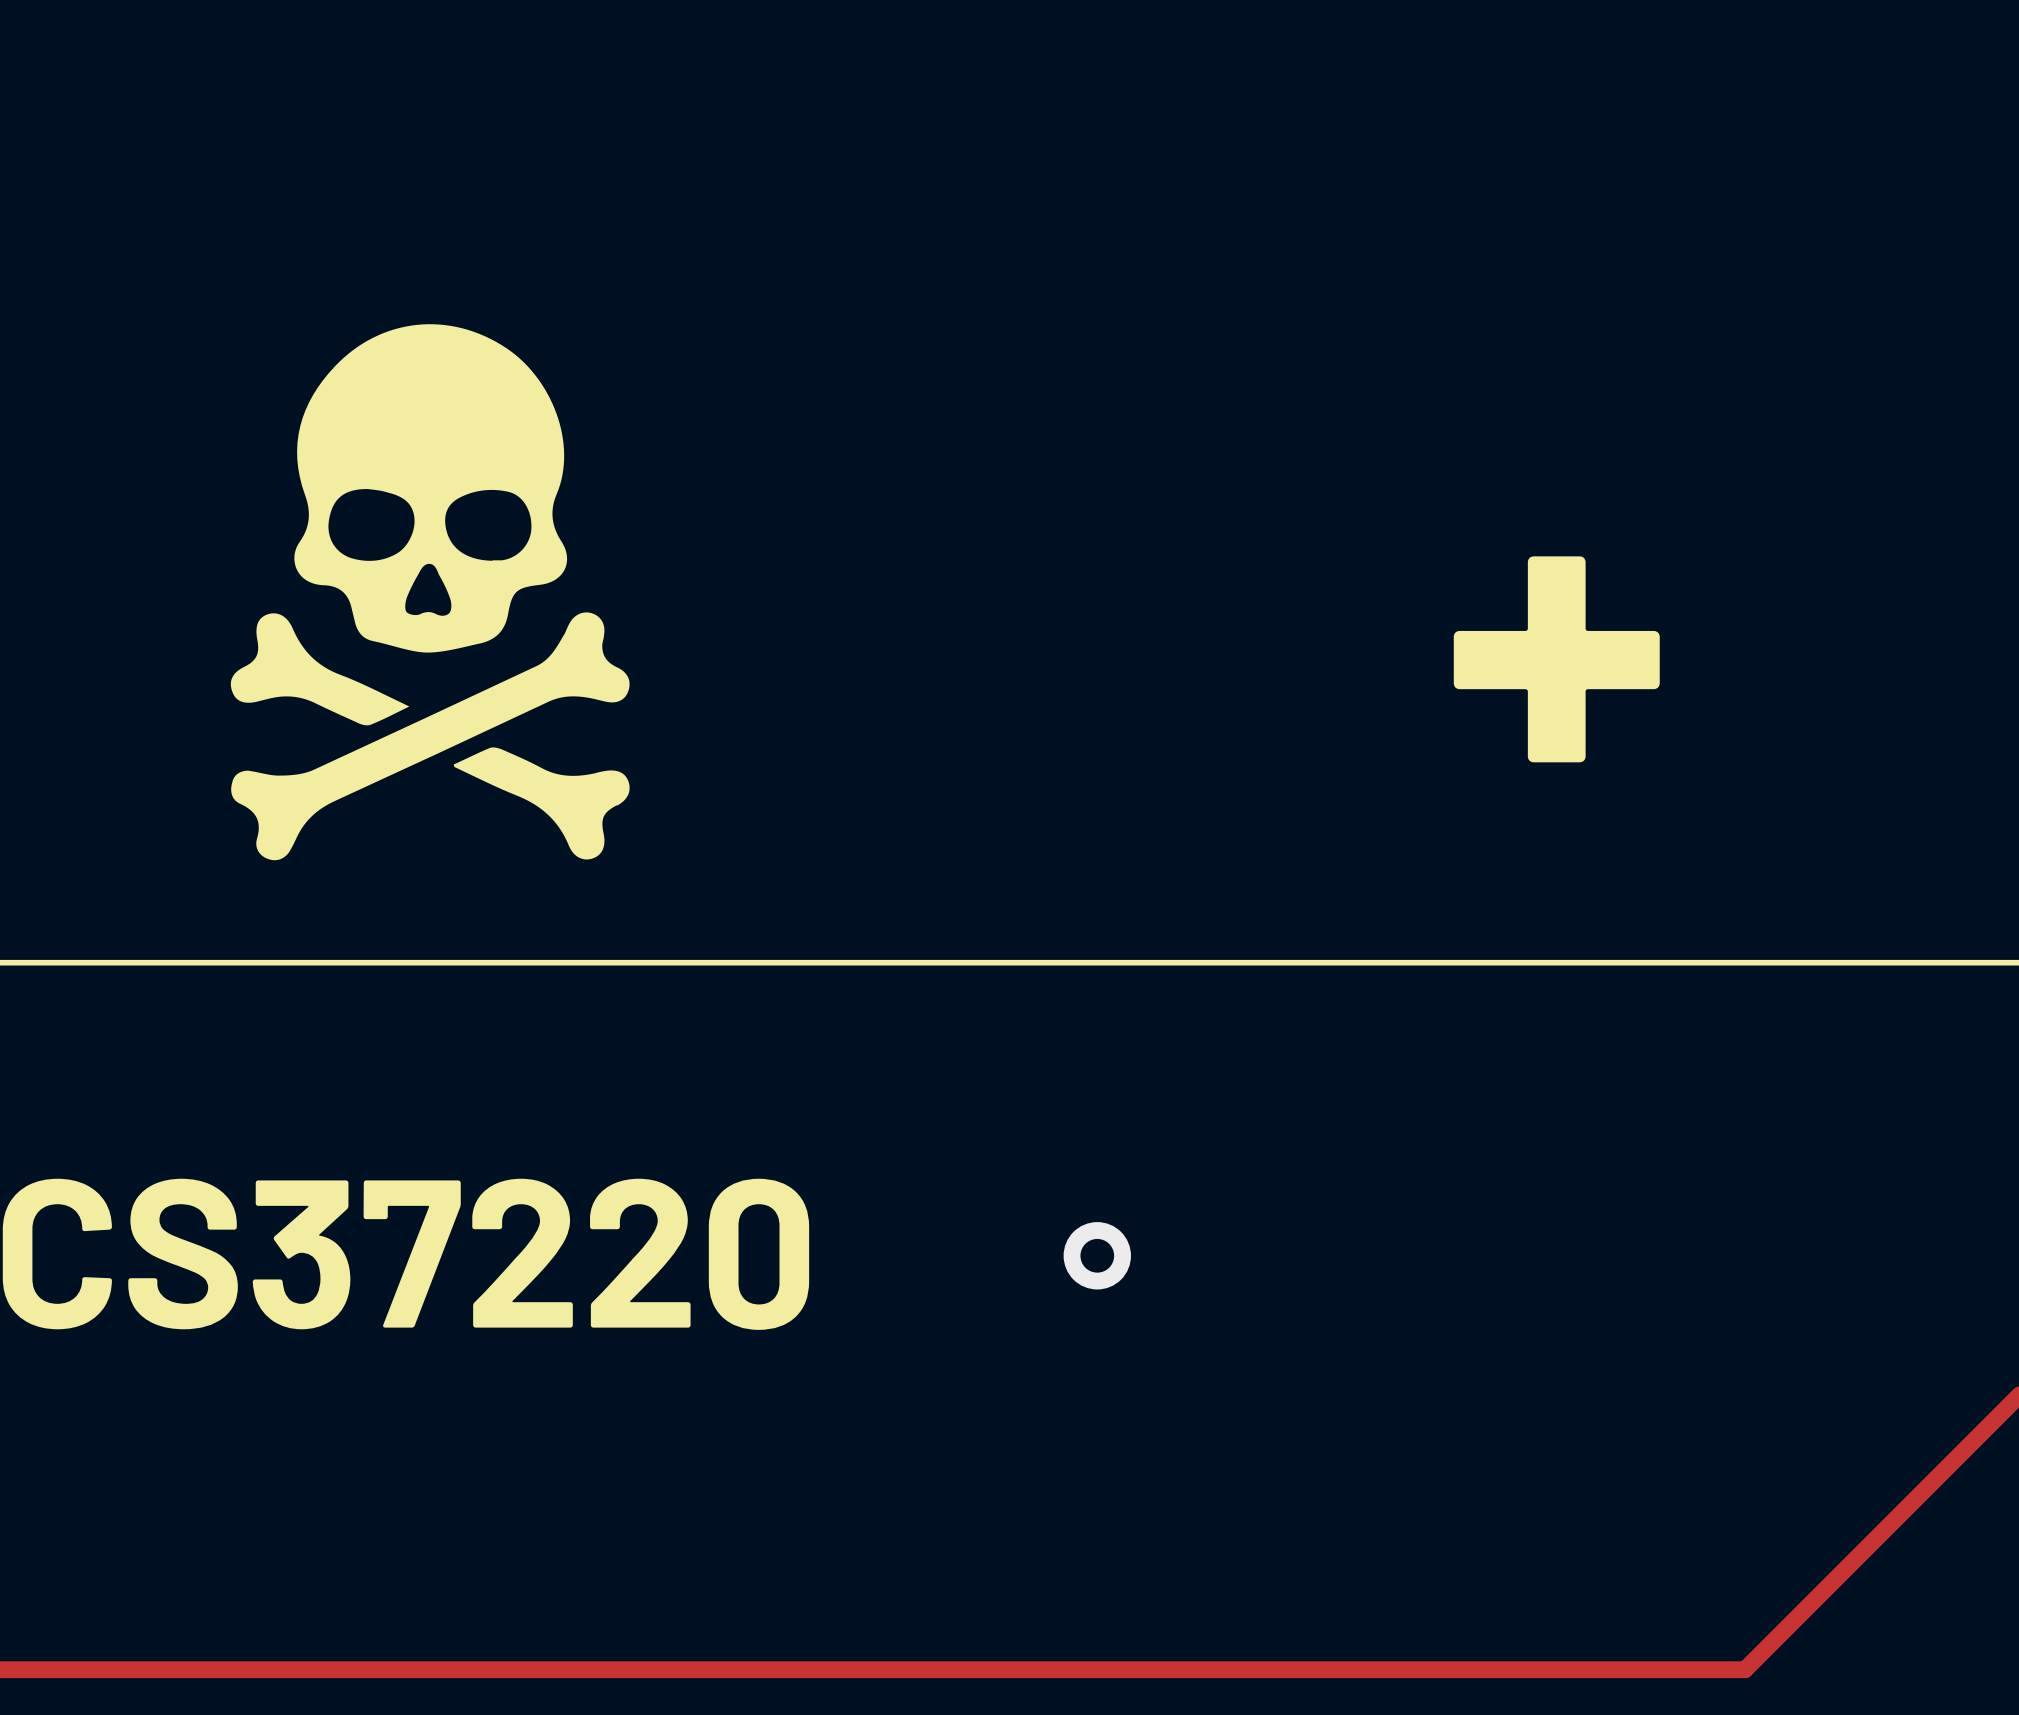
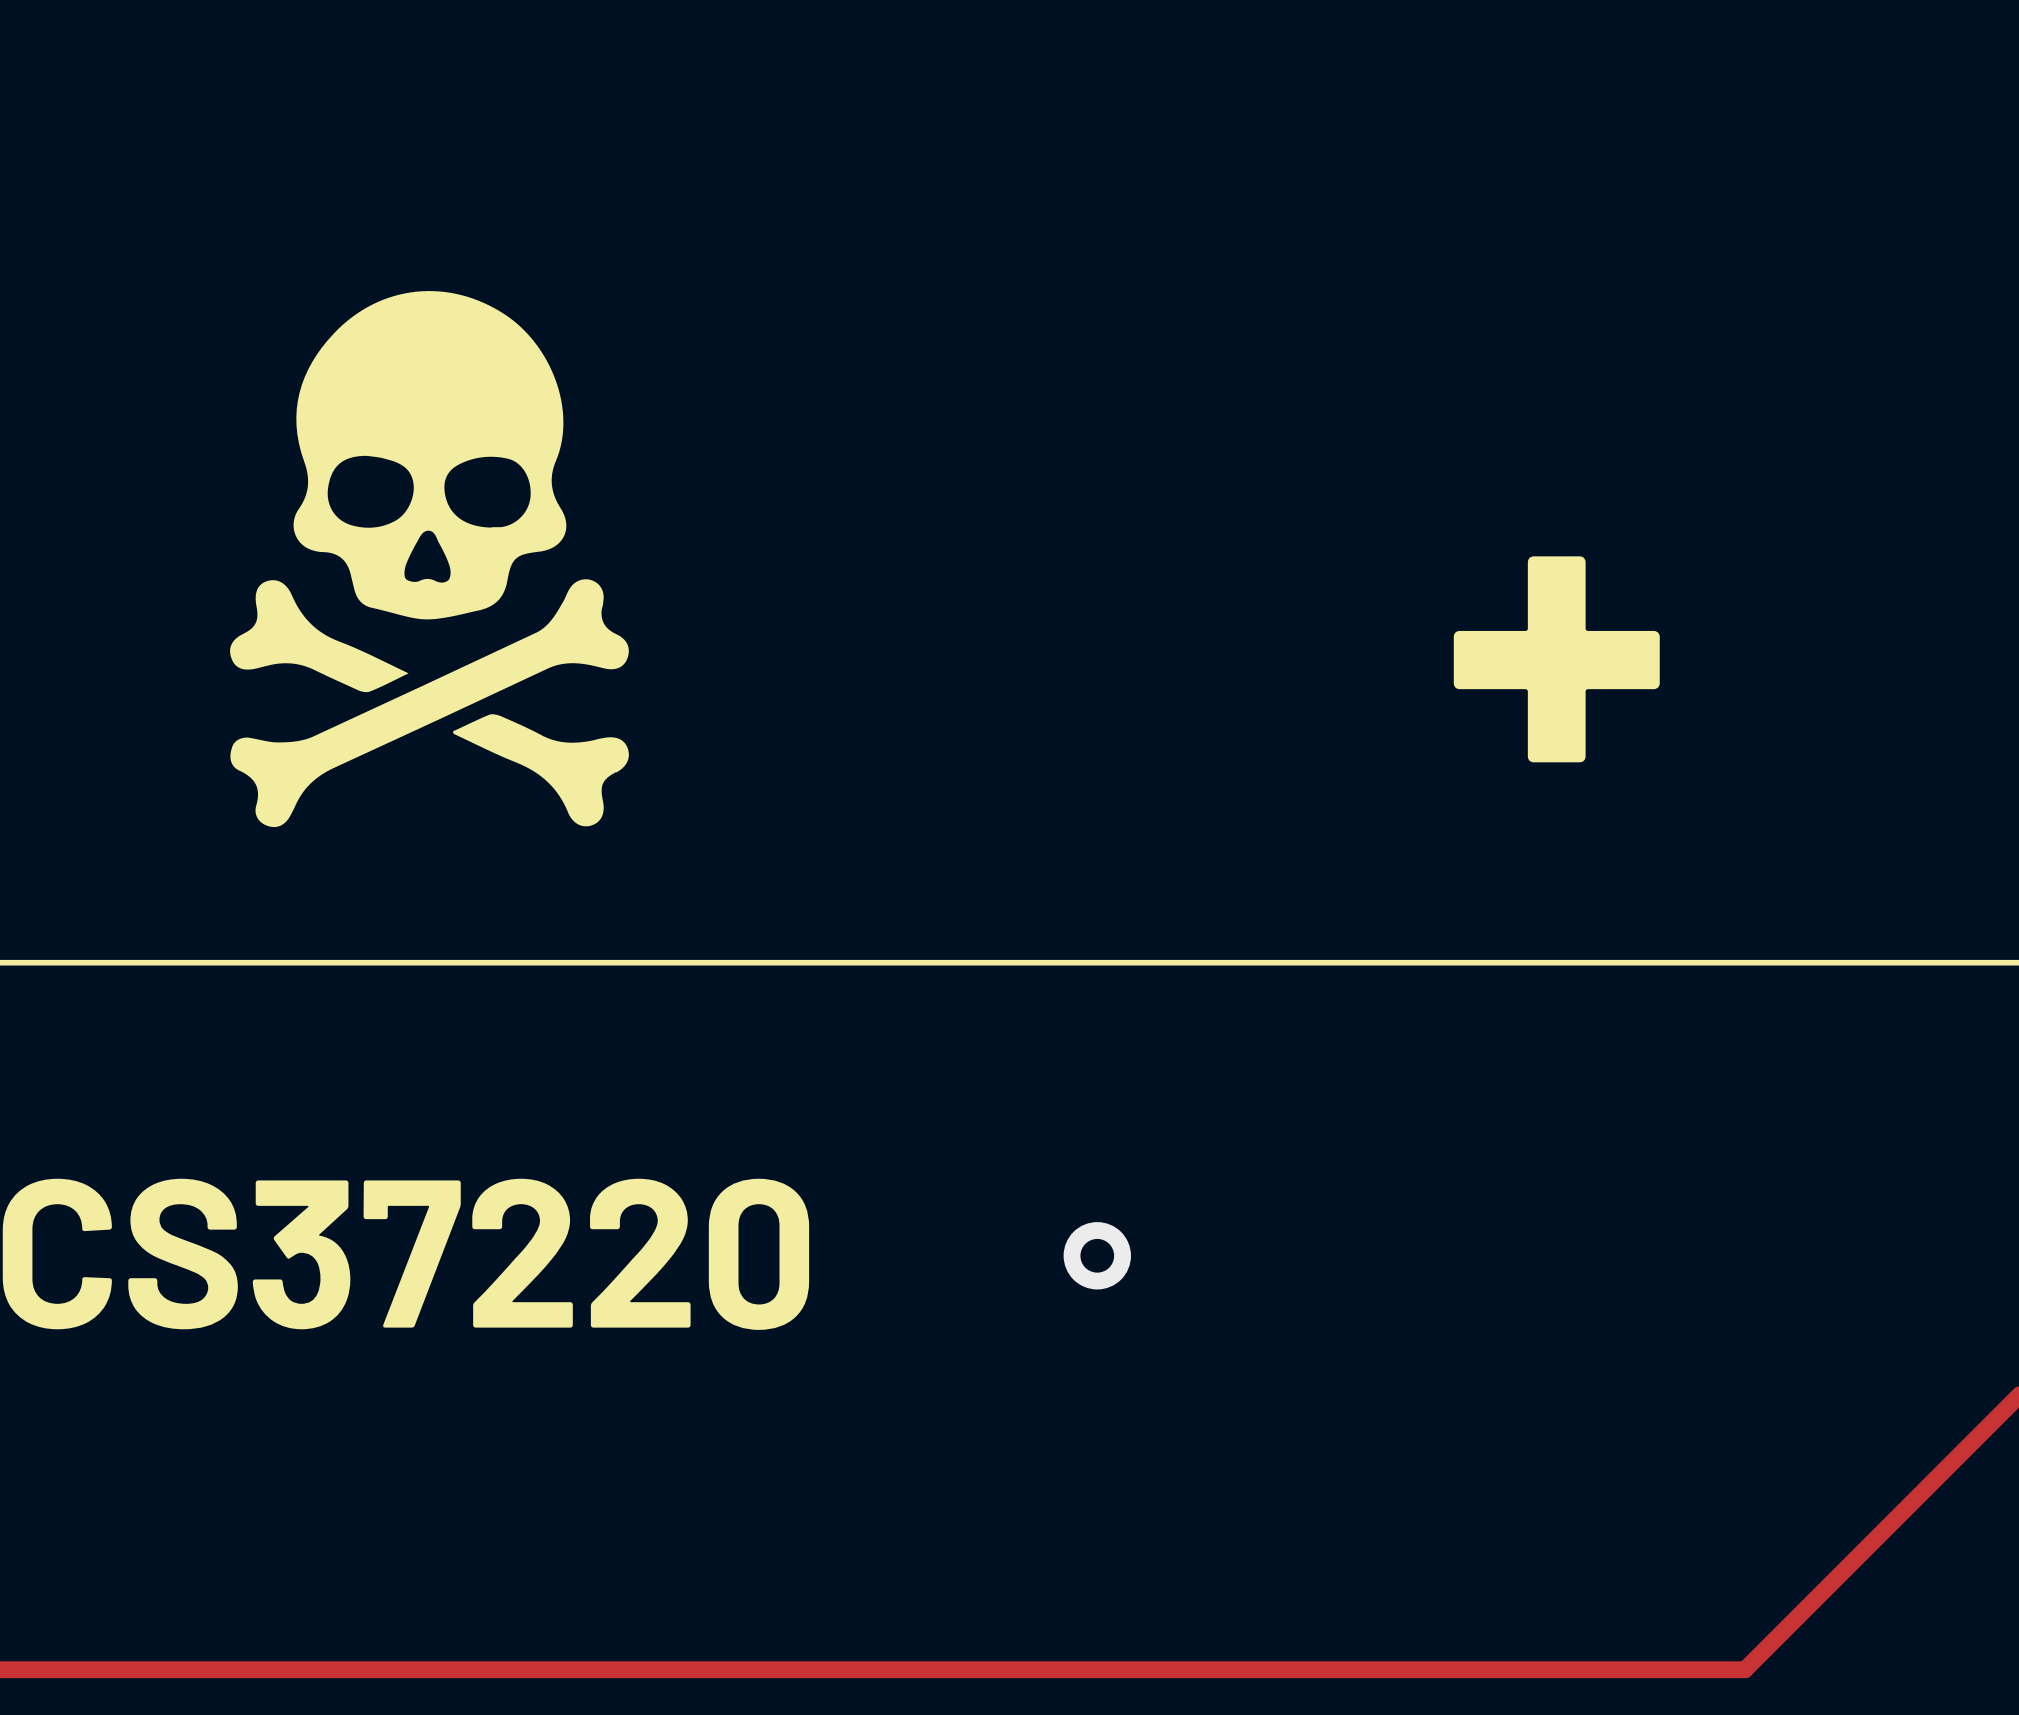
drawing position: (430, 488) -> (429, 455)
drawing position: (320, 669) -> (319, 636)
drawing position: (430, 736) -> (429, 703)
drawing position: (541, 803) -> (540, 770)

